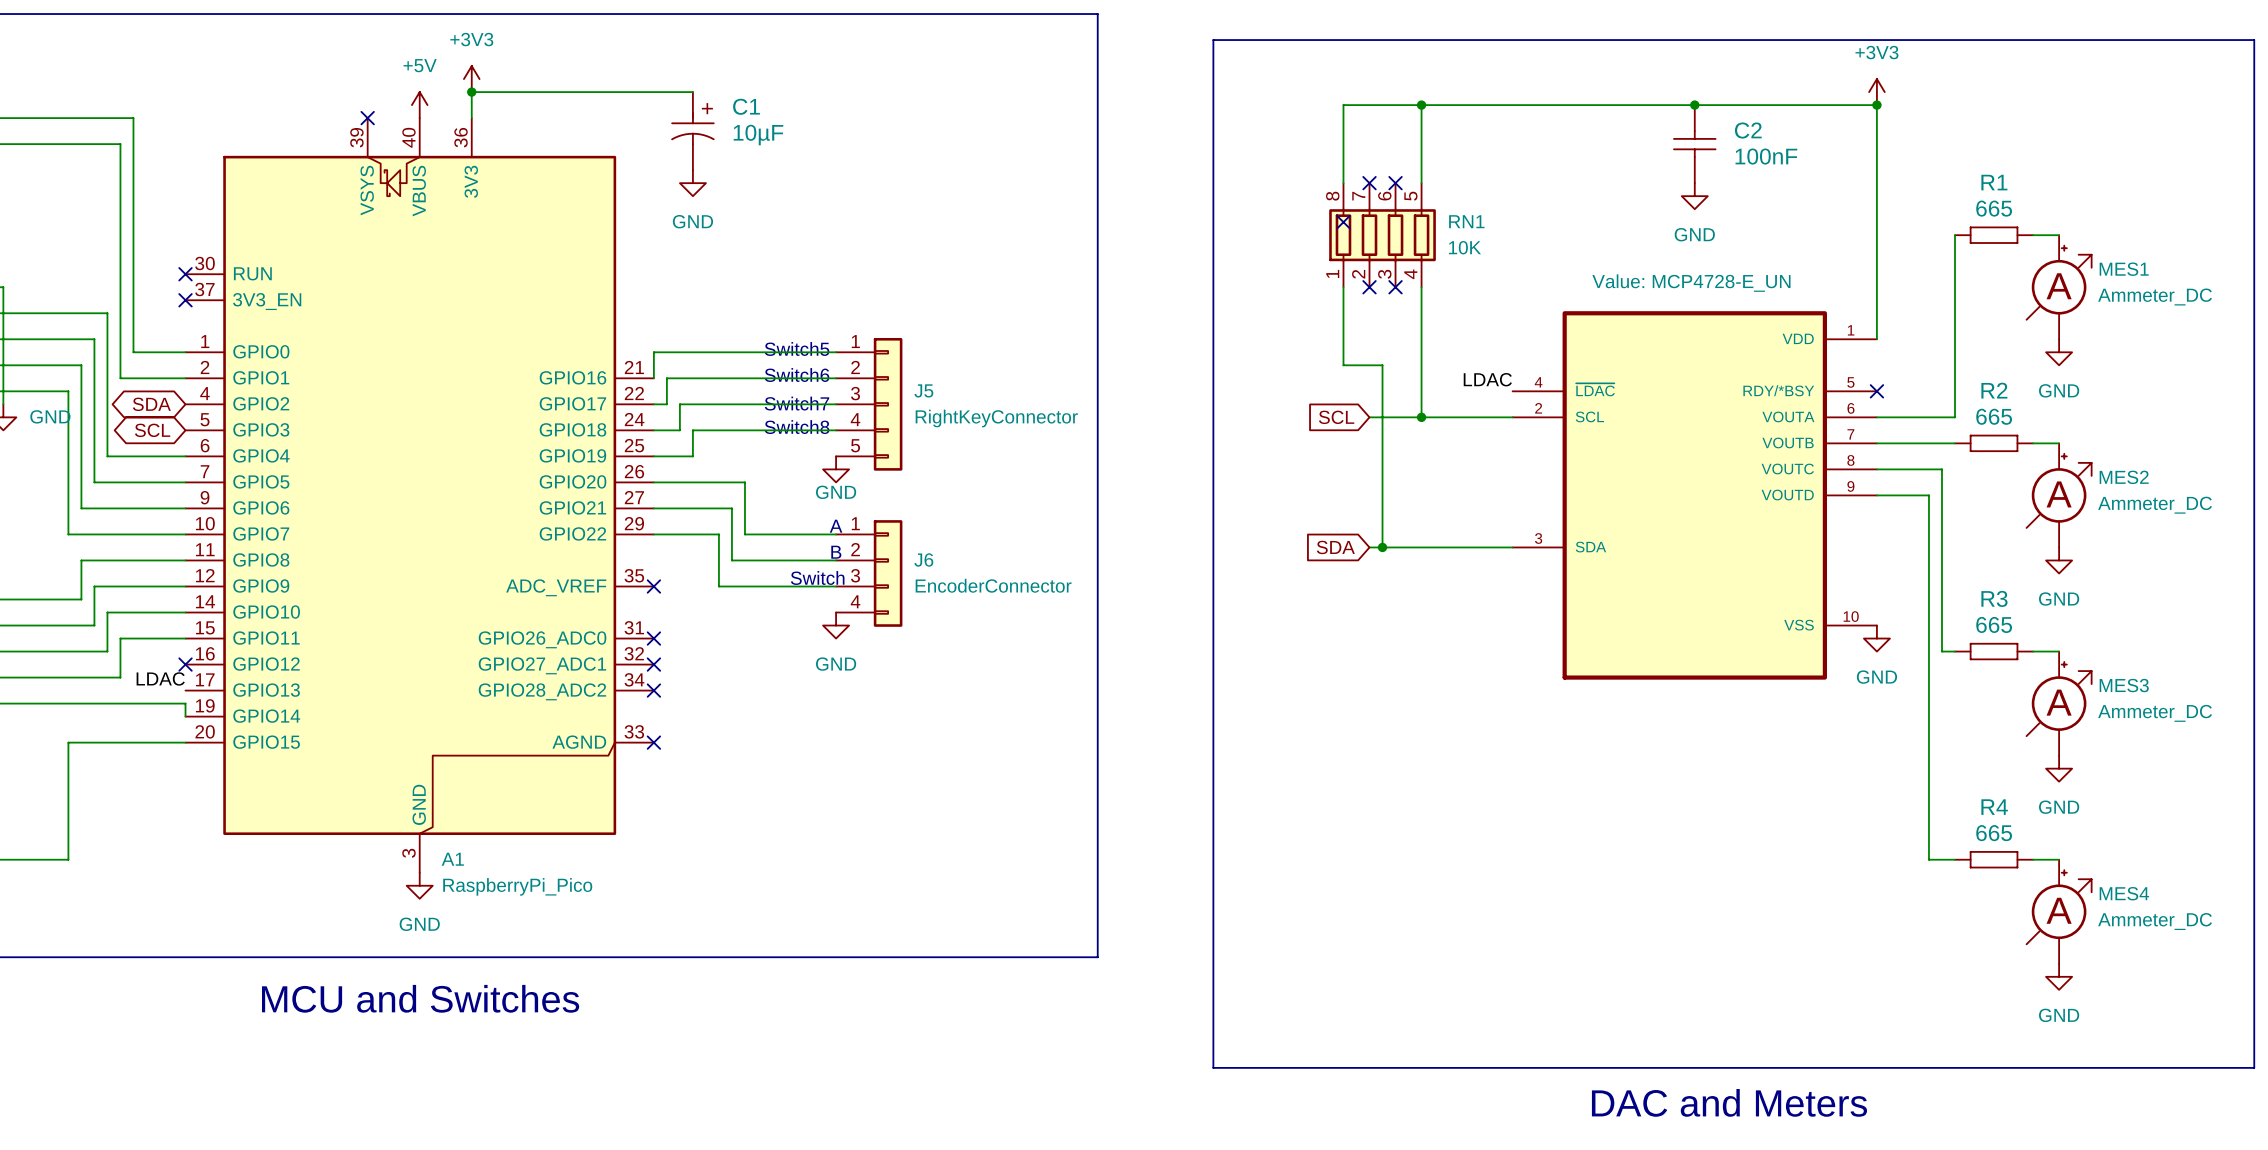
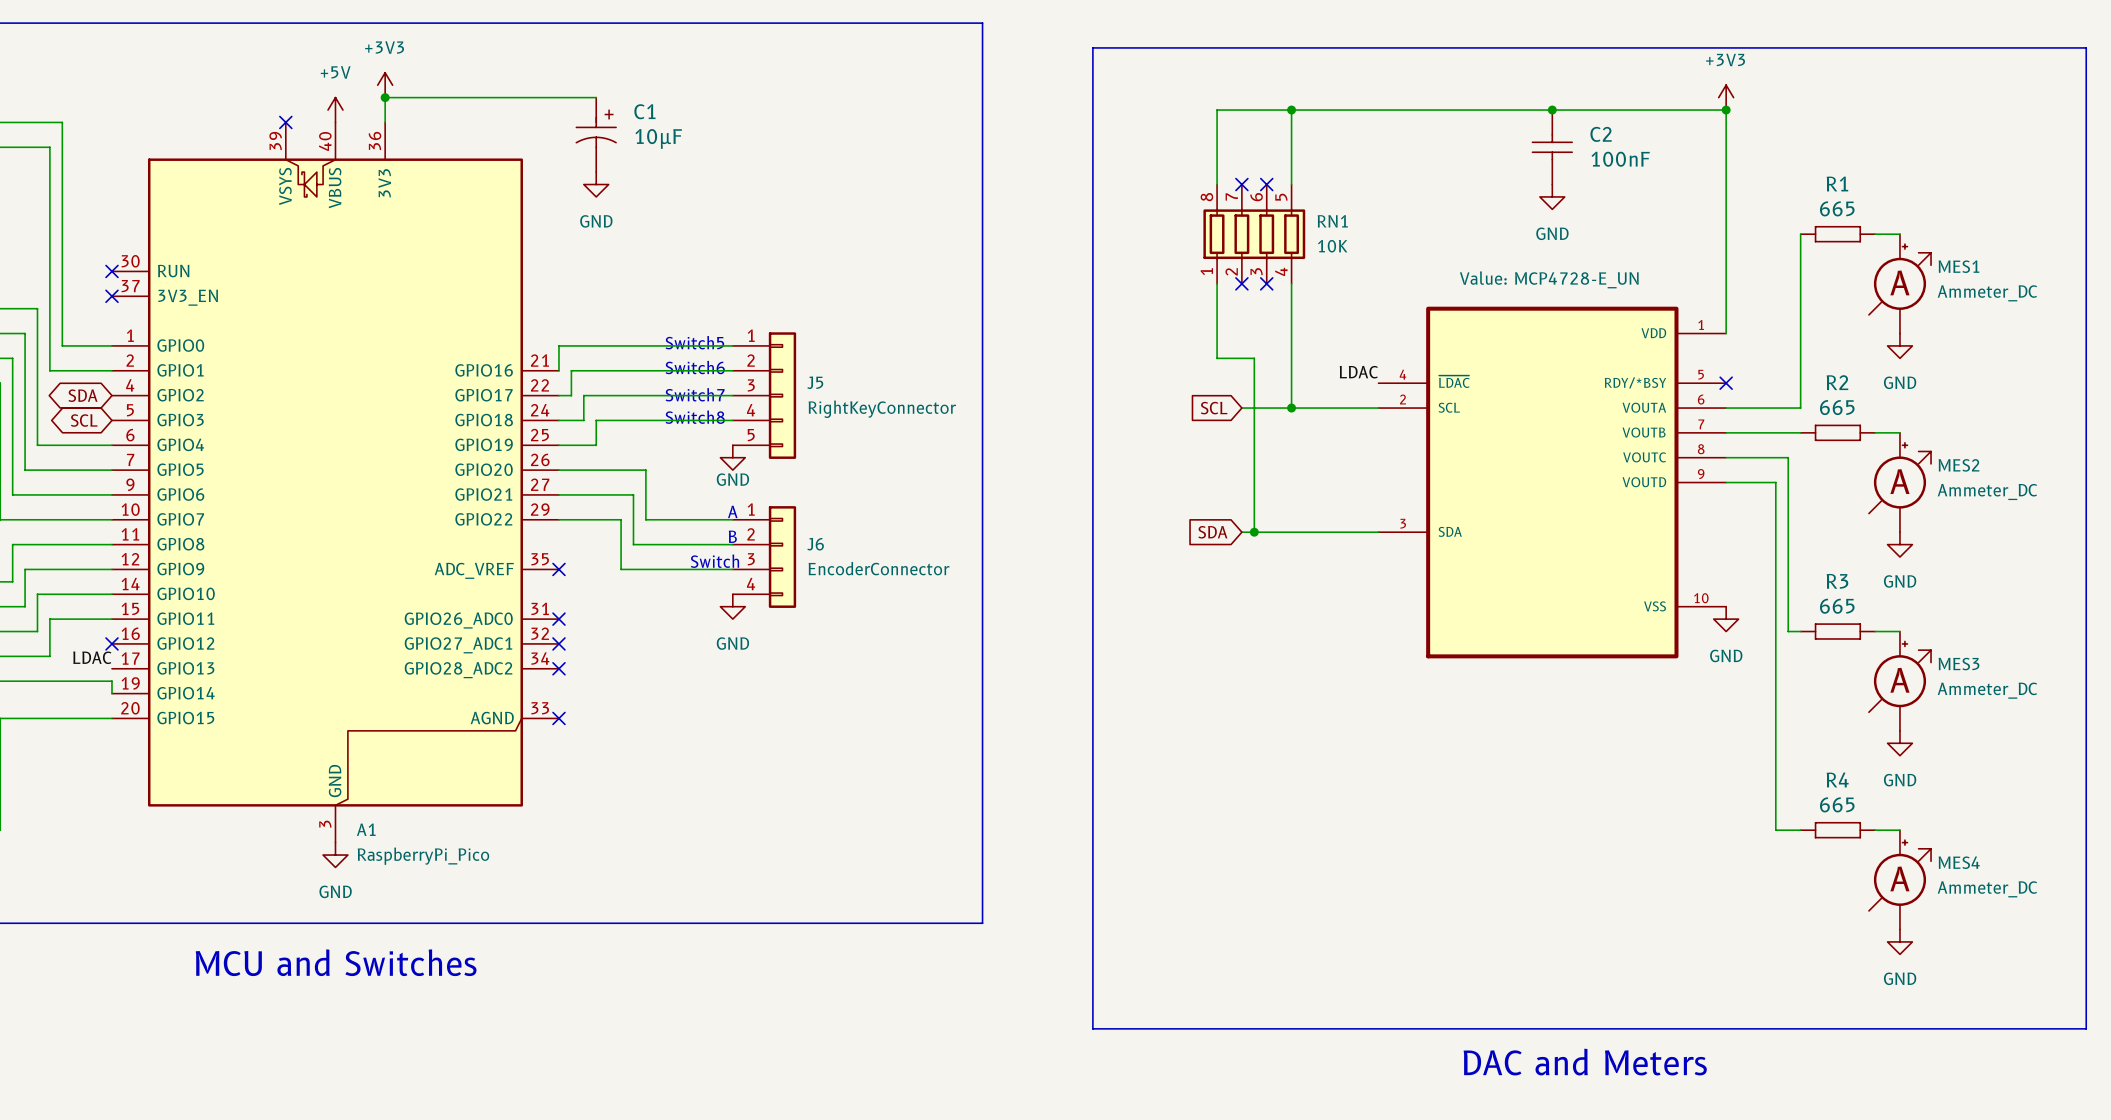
no-connect mark: (1343, 222) -> none

